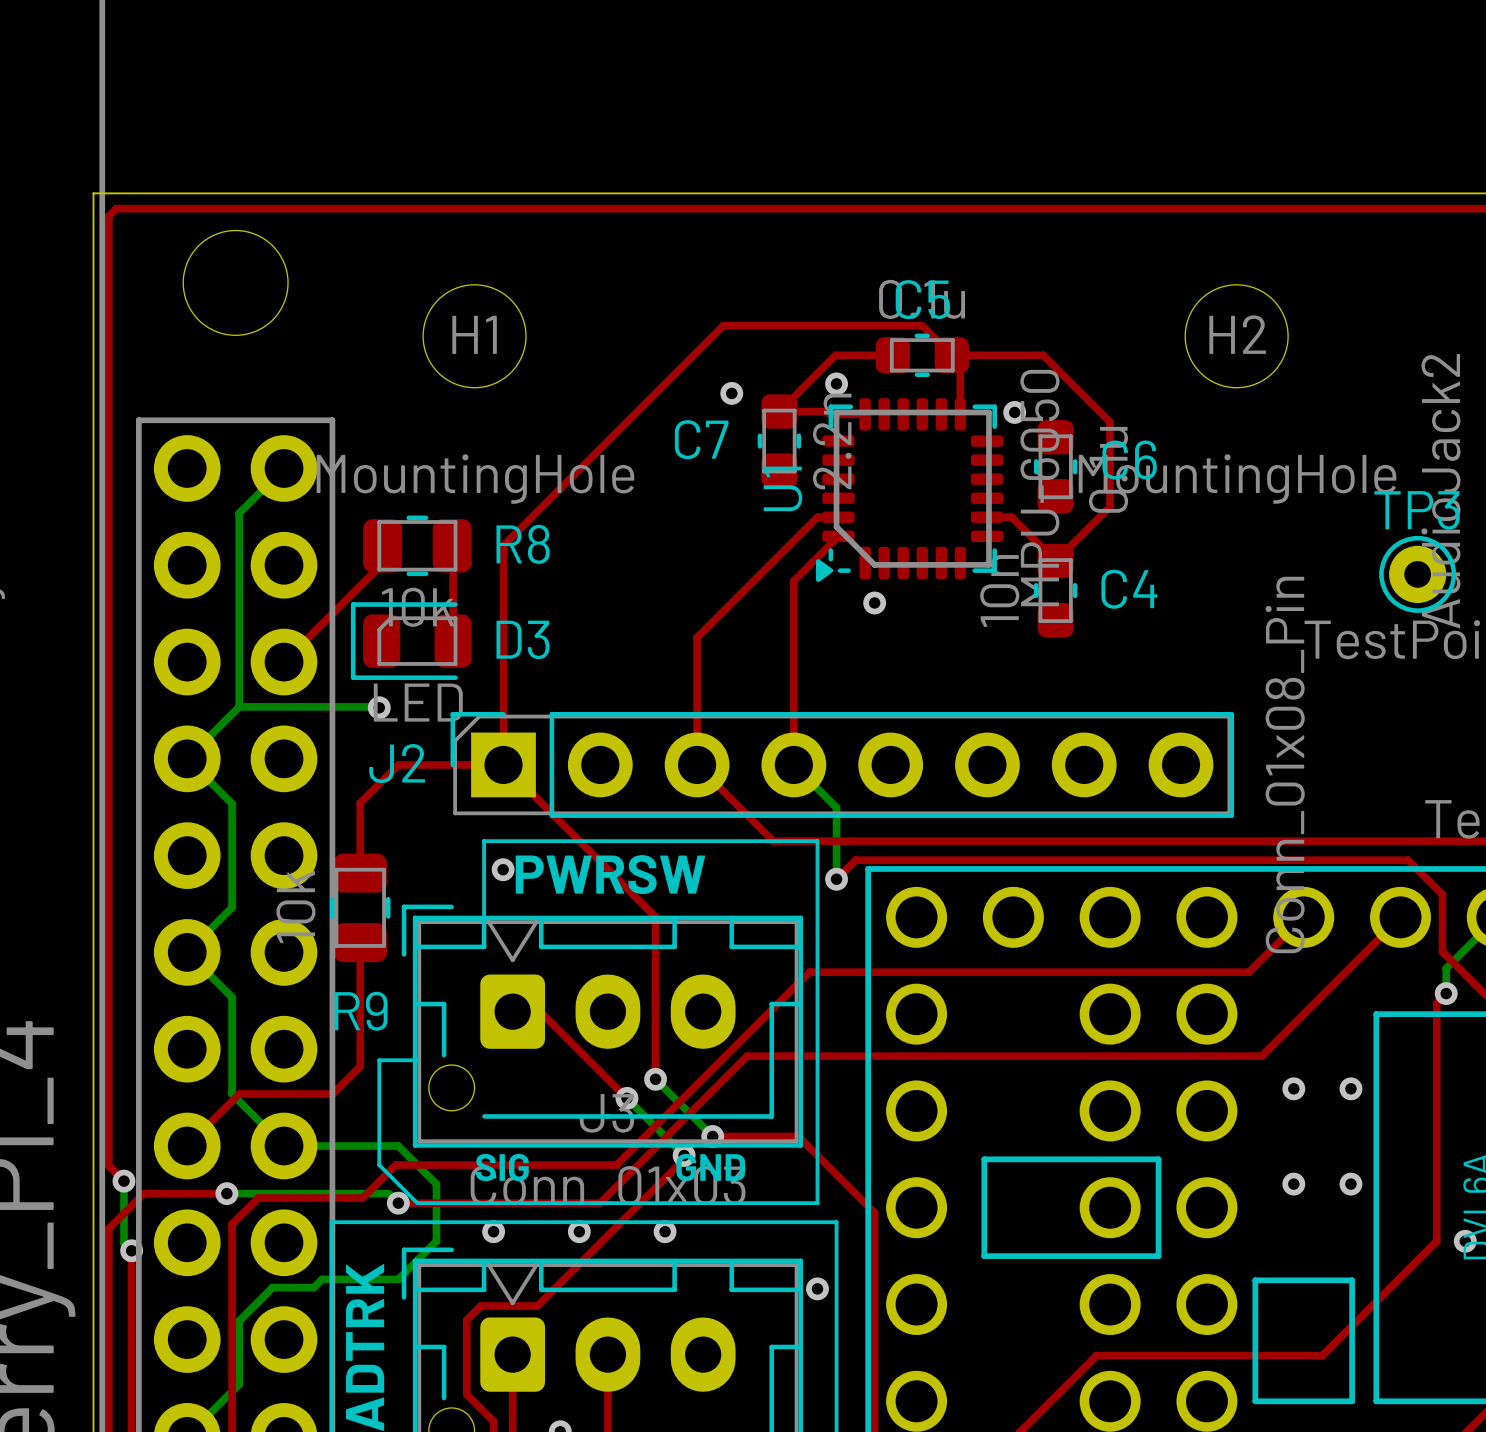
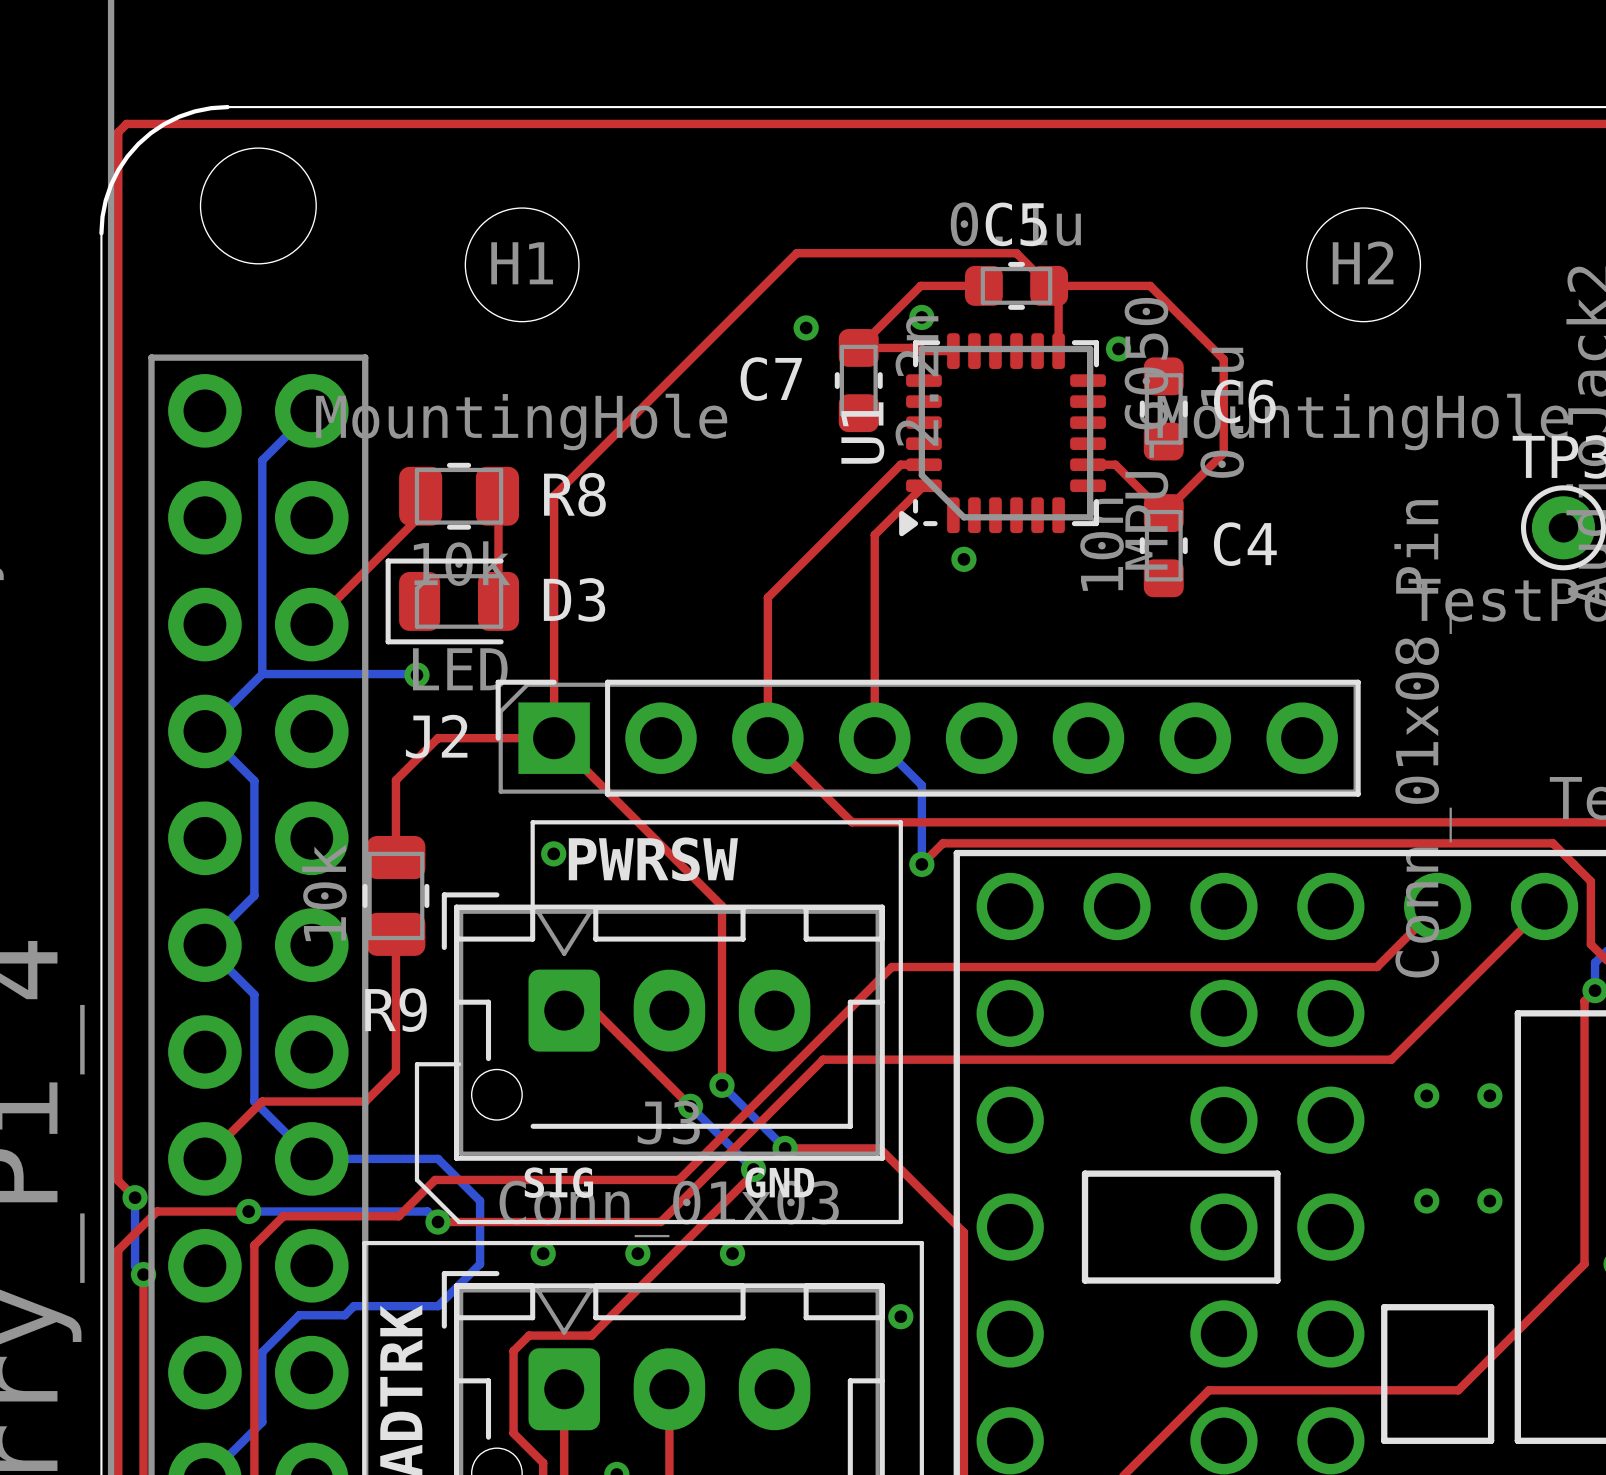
board edge: (207, 193) (93, 193) (93, 307) -> (227, 107) (194, 111) (179, 116) (164, 123) (138, 144) (127, 156) (111, 184) (102, 216) (101, 233)

